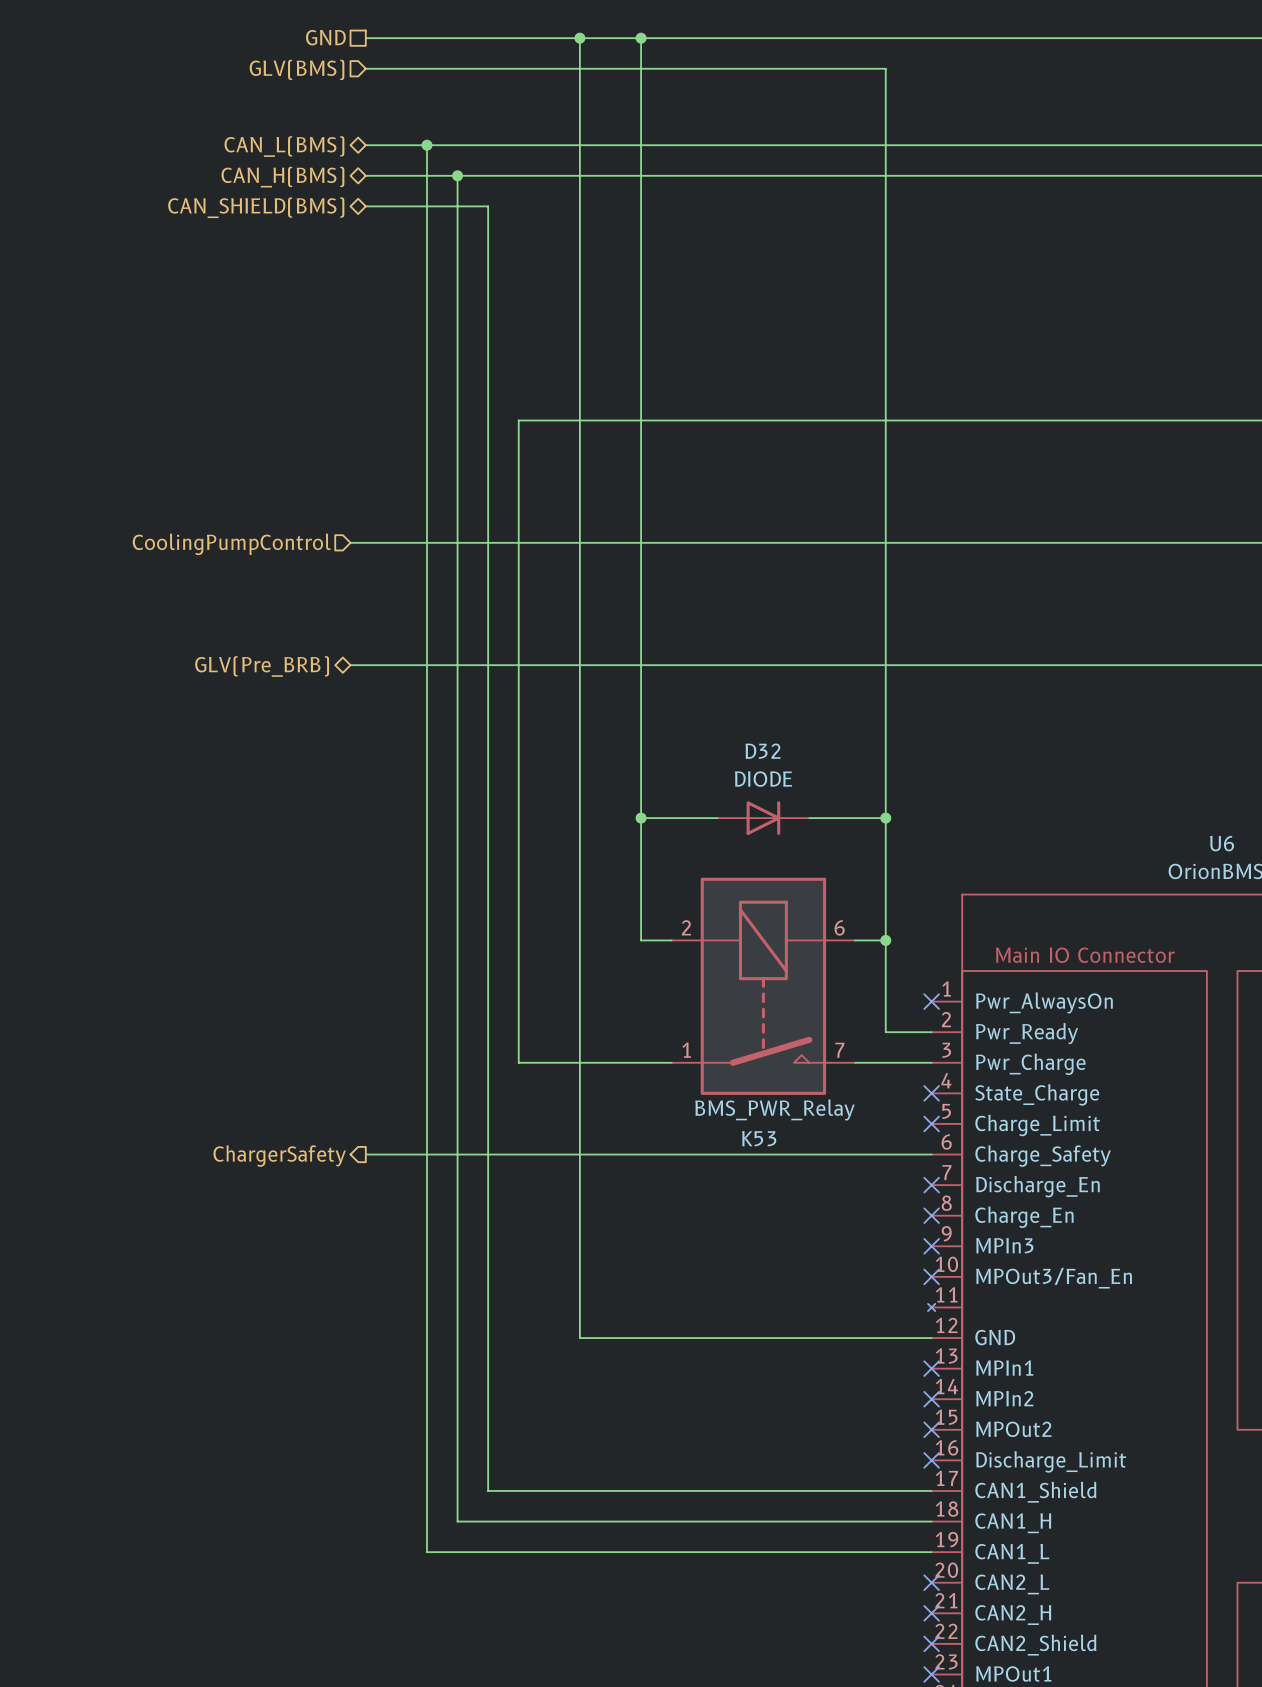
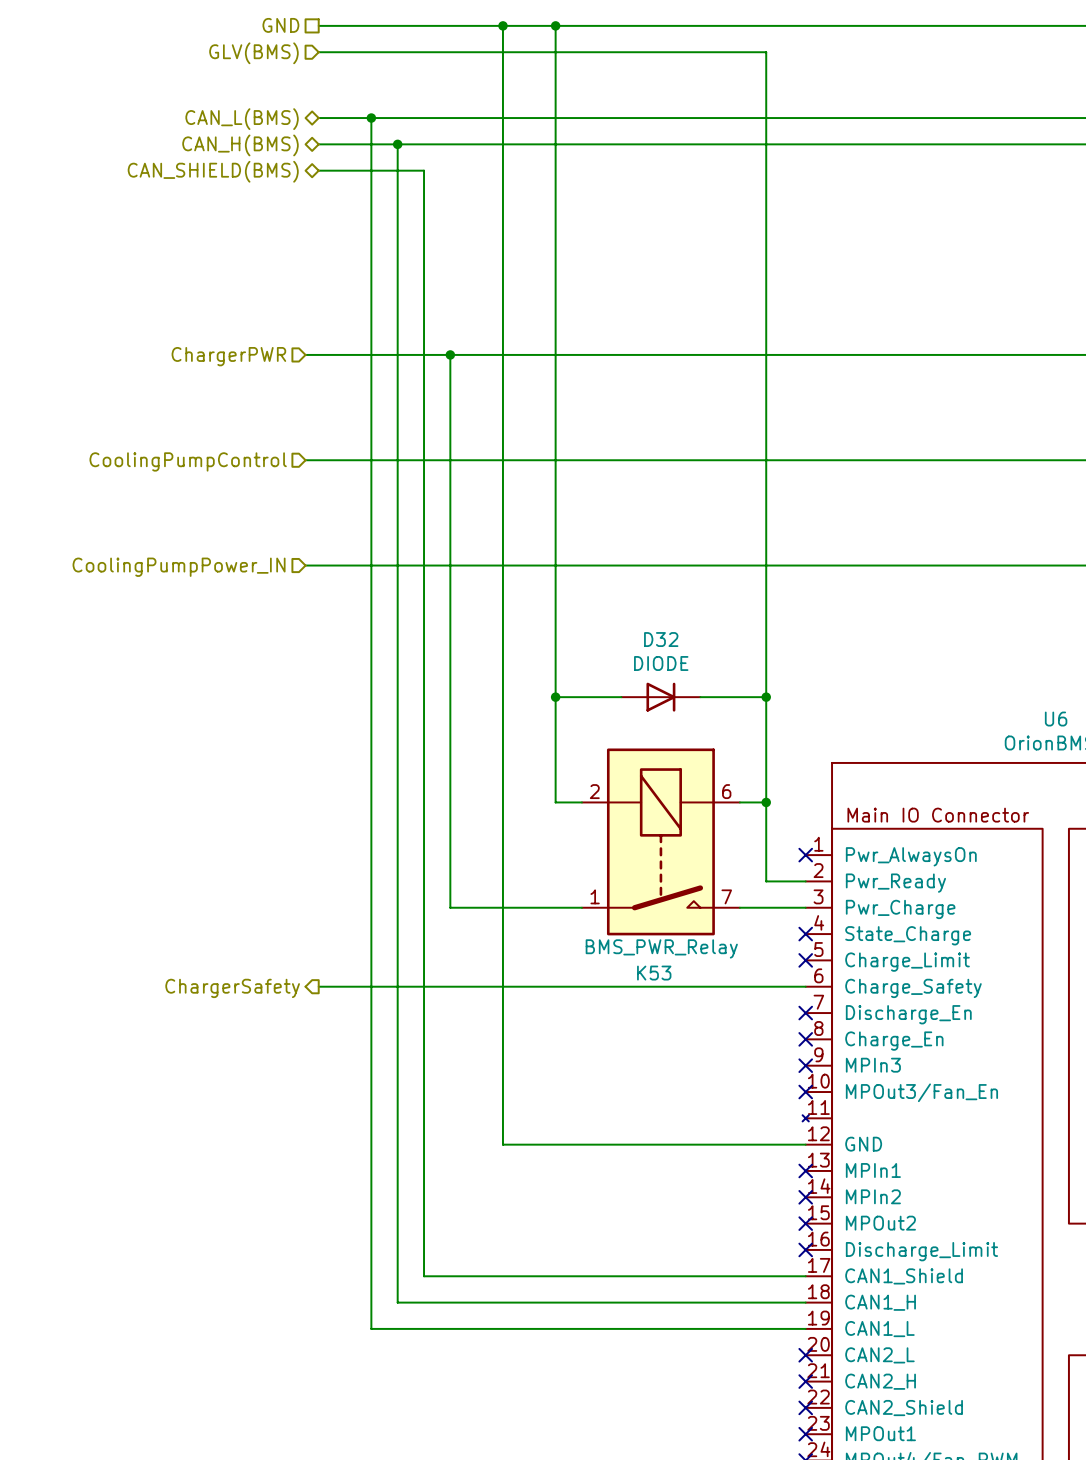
wire: none -> (305, 354) (450, 354)
junction: none -> (450, 354)
hierarchical label: none -> ChargerPWR (228, 356)
hierarchical label shape: bidirectional (262, 666) -> input (179, 567)
hierarchical label: GLV(Pre_BRB) (262, 666) -> CoolingPumpPower_IN (179, 567)

